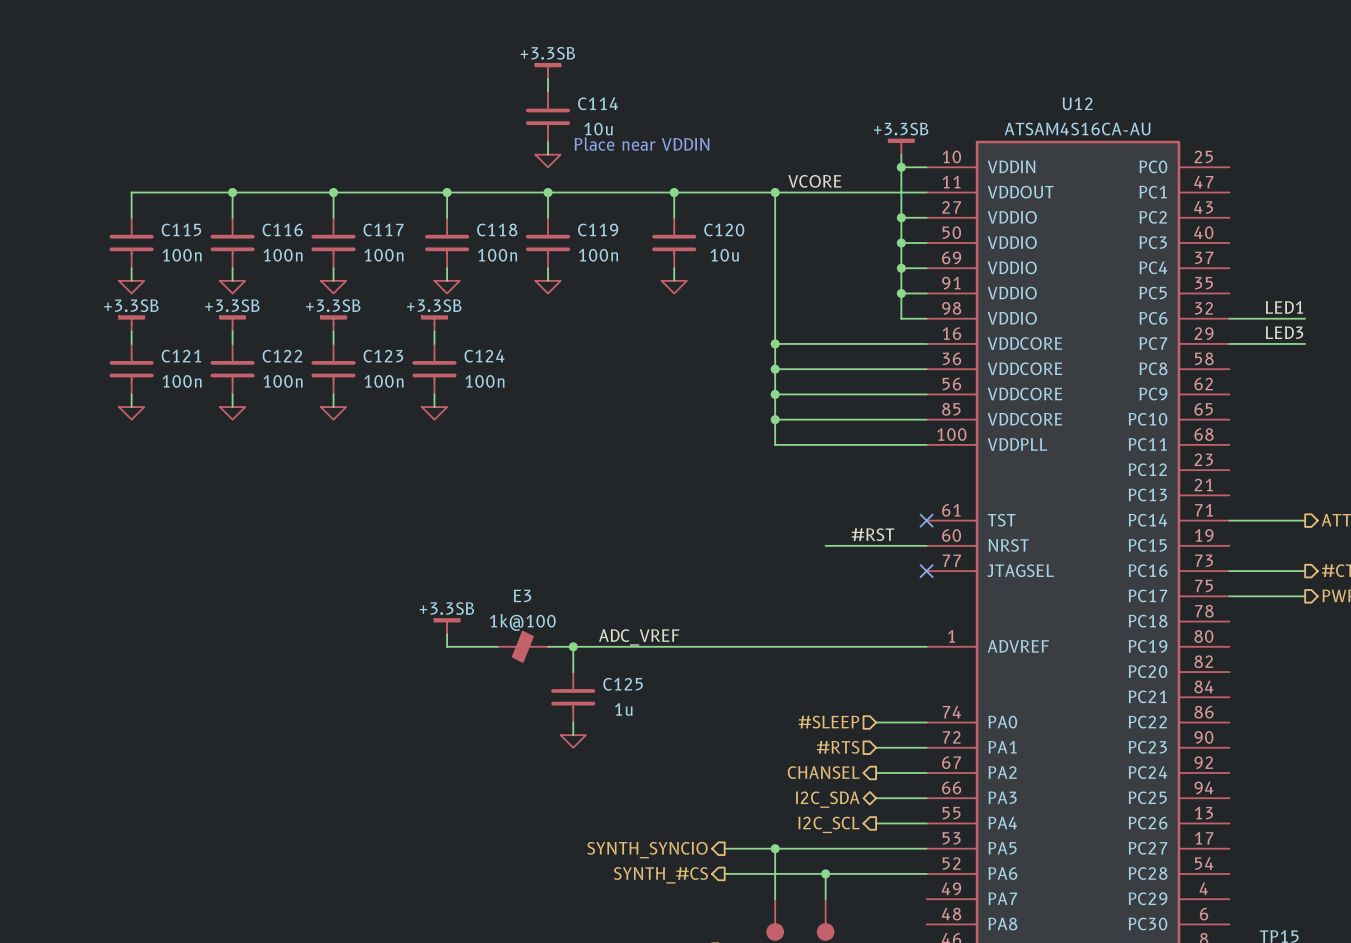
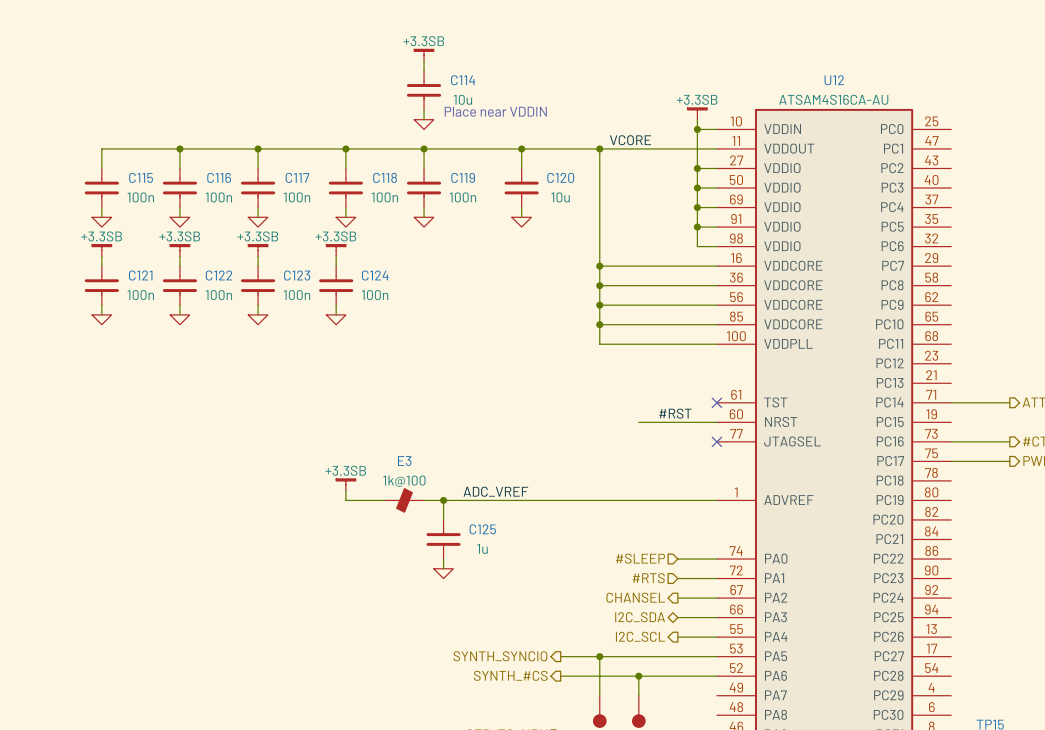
label: LED1 (1284, 307) -> none
wire: (1229, 318) (1305, 318) -> none
label: LED3 (1284, 332) -> none
wire: (1229, 343) (1305, 343) -> none

